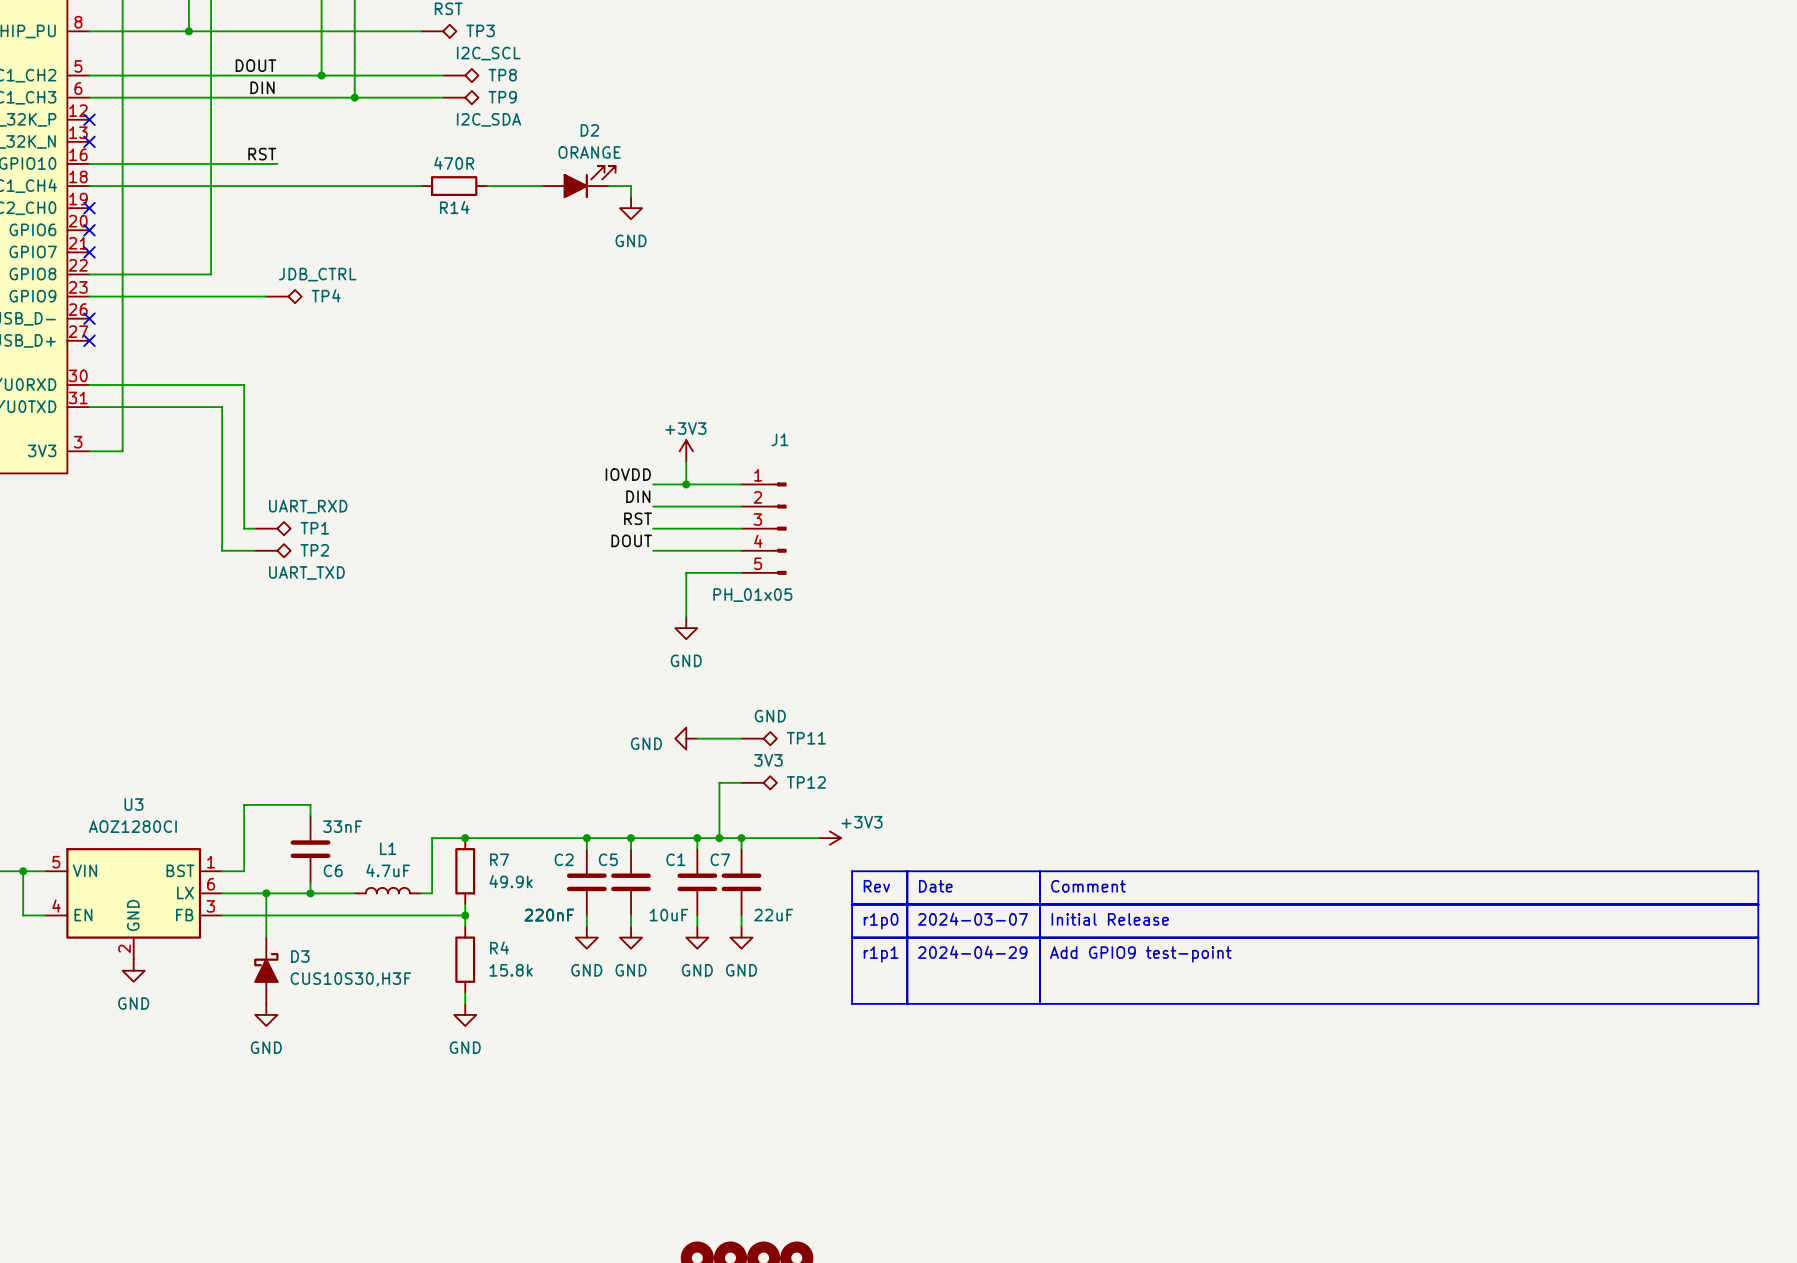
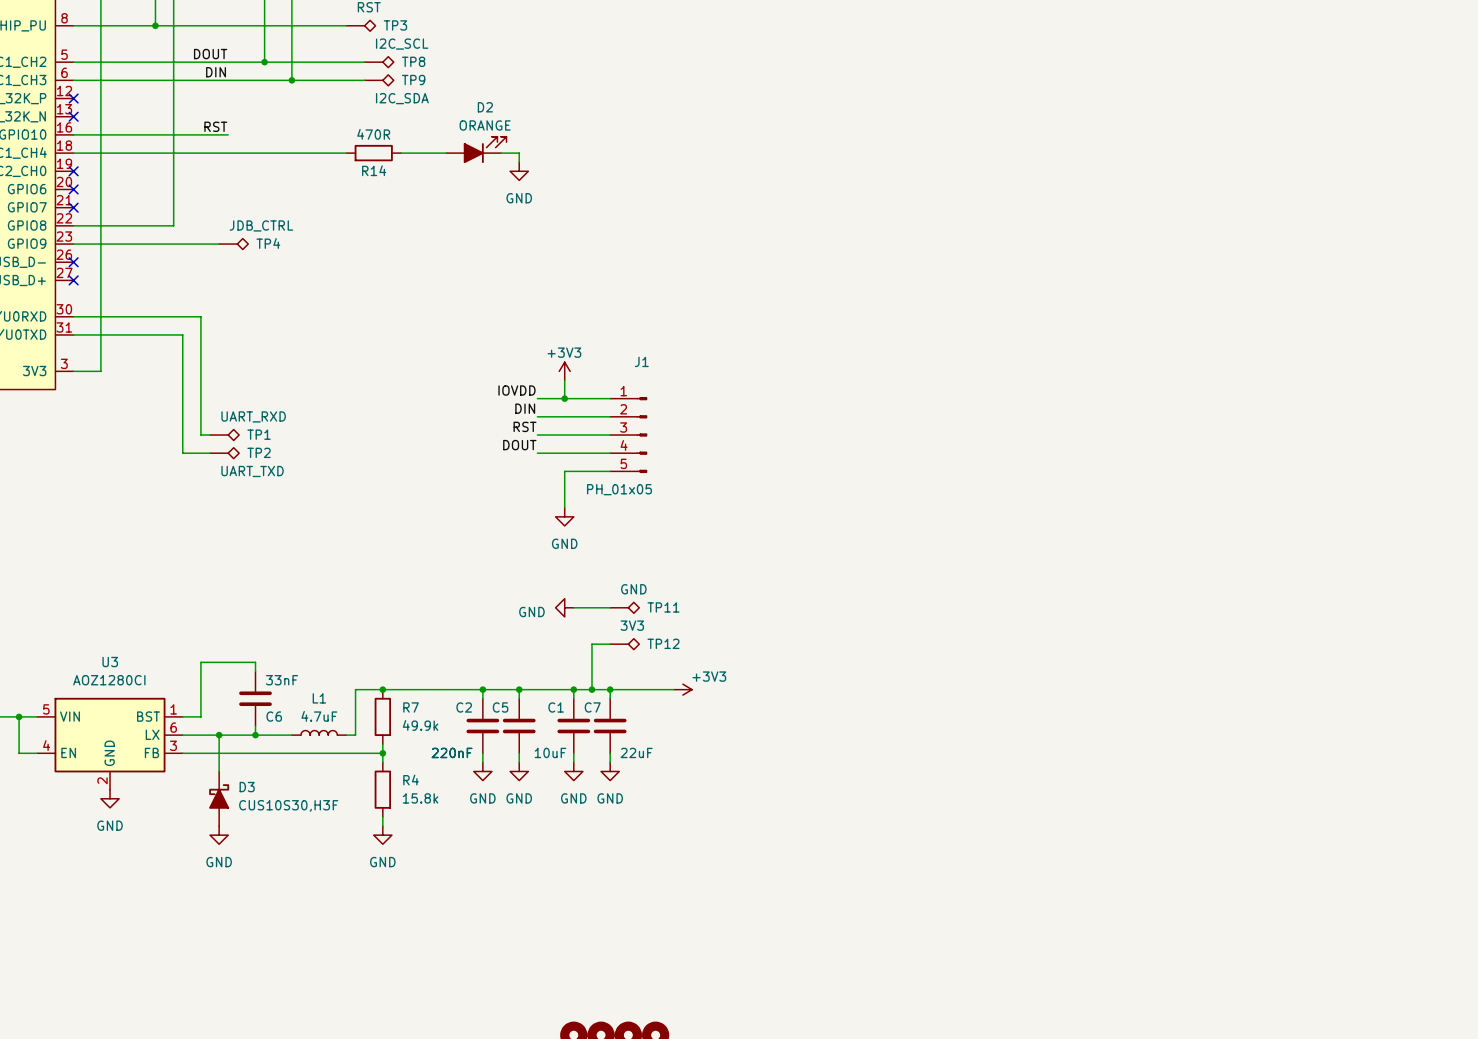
line: (852, 871) (1758, 871) (1758, 1003) (852, 1003) (852, 871) -> none
line: (907, 871) (907, 1003) -> none
line: (1039, 871) (1039, 1003) -> none
text: Rev (876, 886) -> none
text: Date (935, 886) -> none
text: Comment (1088, 886) -> none
line: (852, 904) (1758, 904) (852, 904) -> none
text: 2024-03-07 (972, 919) -> none
text: Initial Release (1110, 919) -> none
text: r1p0 (881, 921) -> none
line: (852, 937) (1758, 937) -> none
text: 2024-04-29 (972, 952) -> none
text: r1p1 (881, 954) -> none
text: Add GPIO9 test-point (1140, 954) -> none

